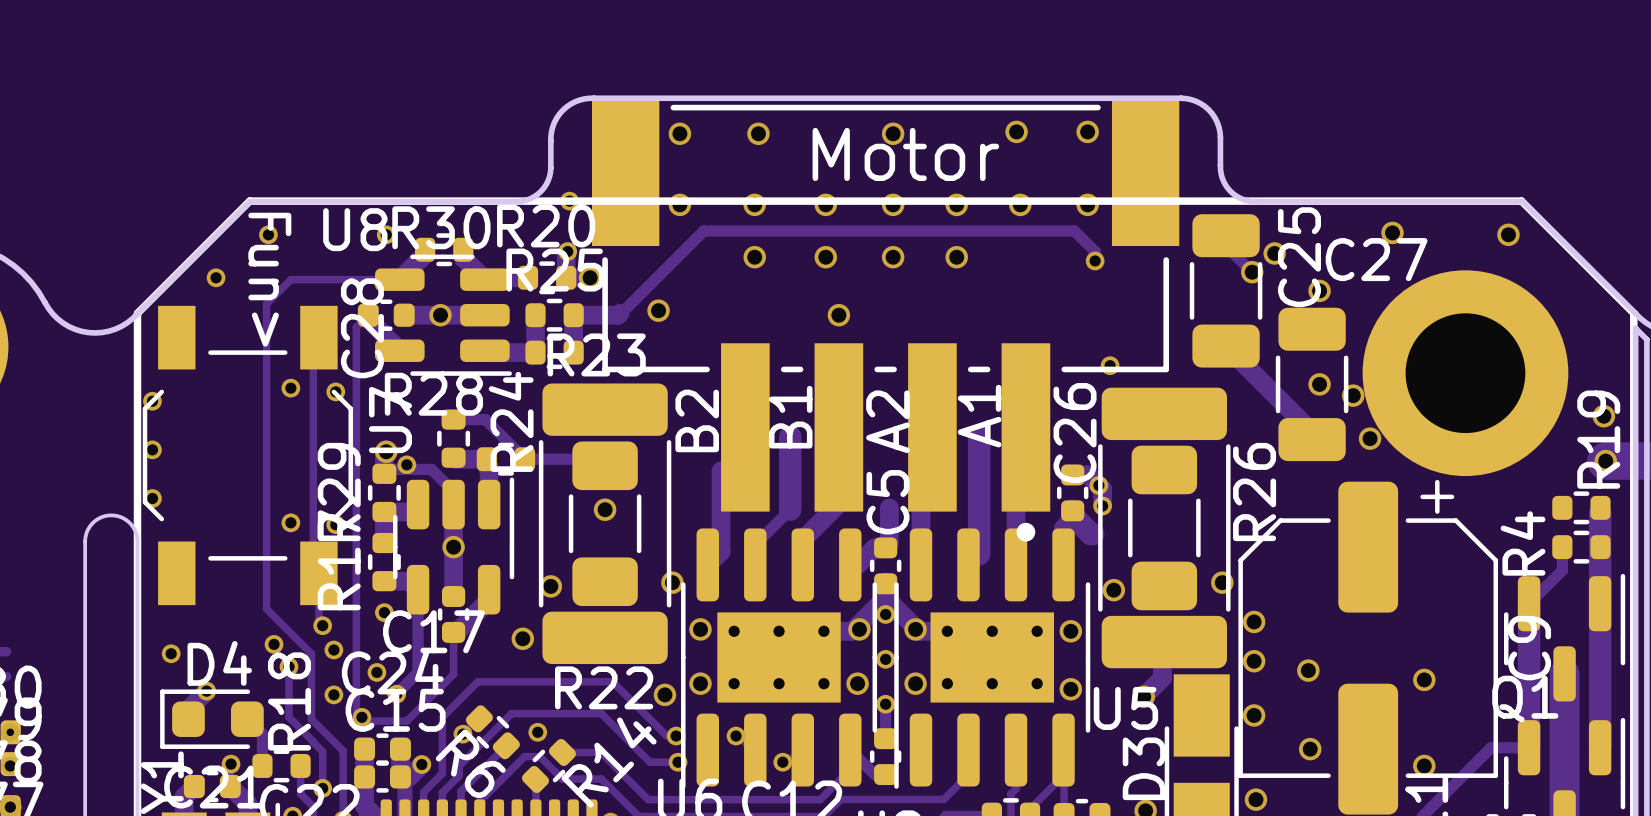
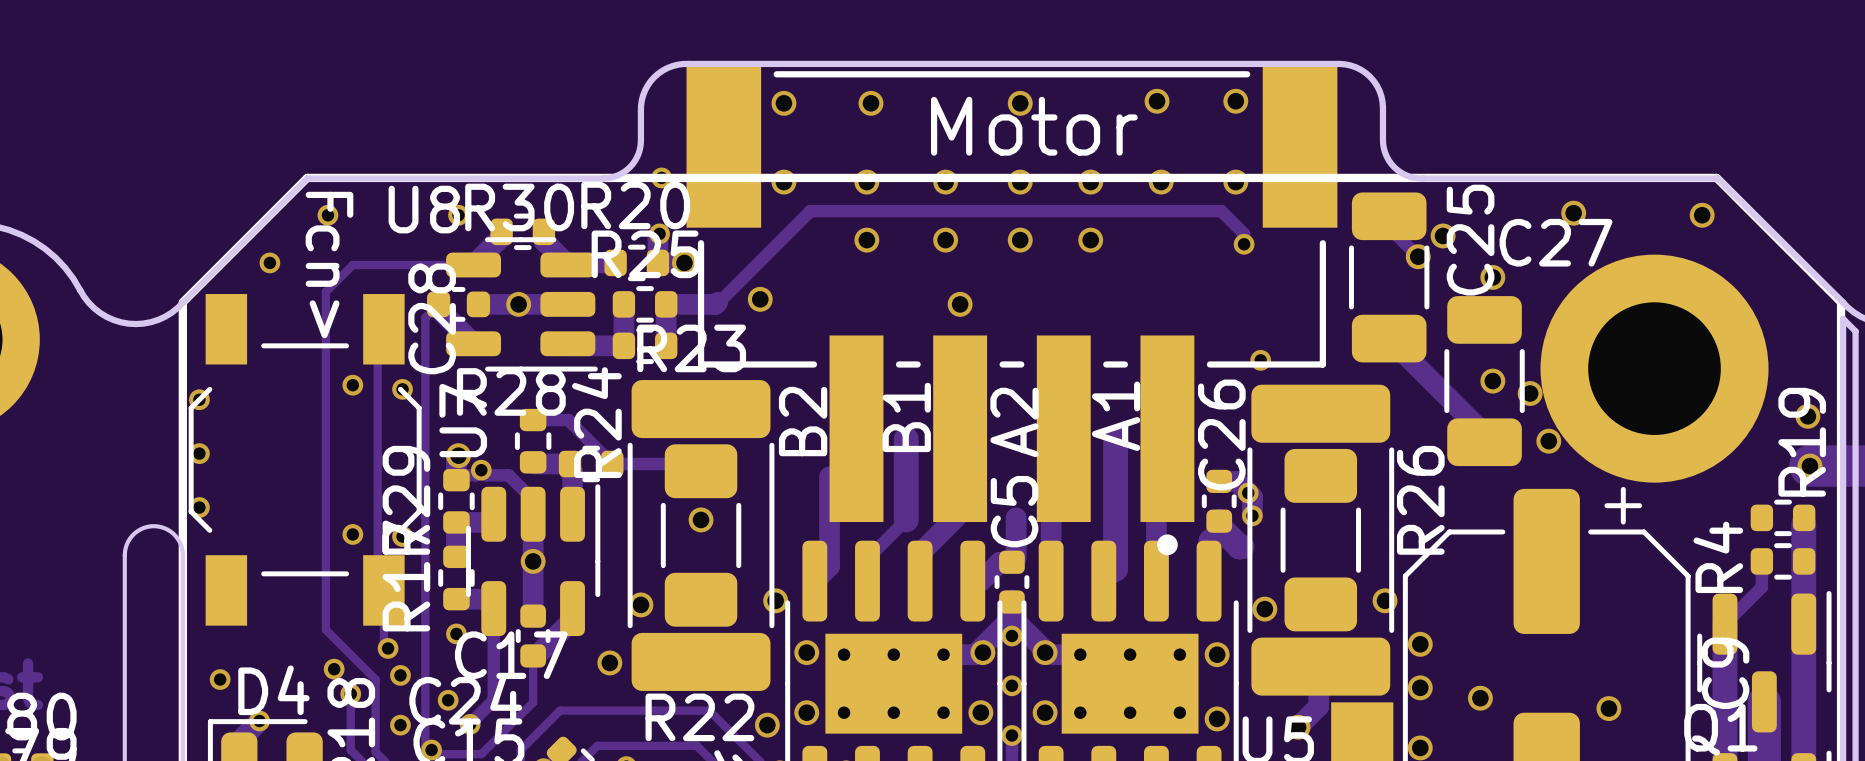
part value: Fun> (269, 279) -> Fcn> (329, 265)

